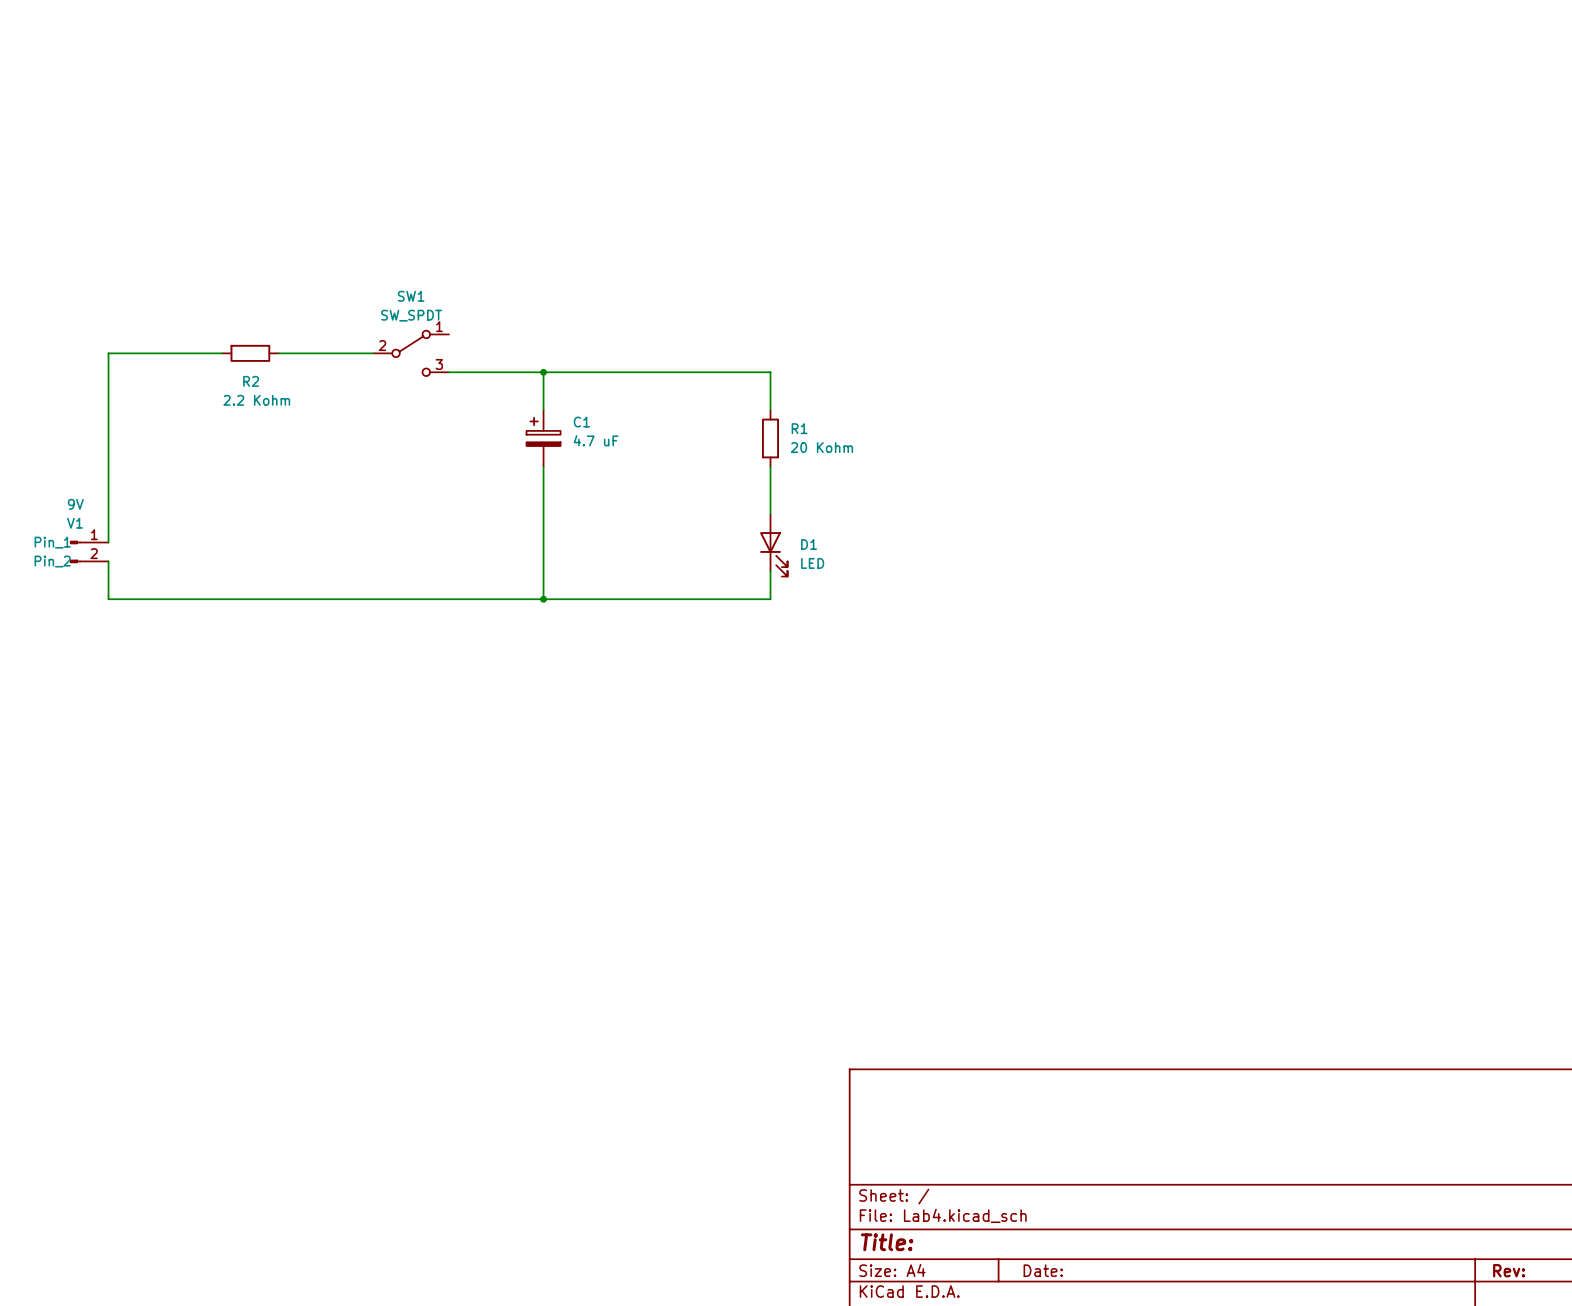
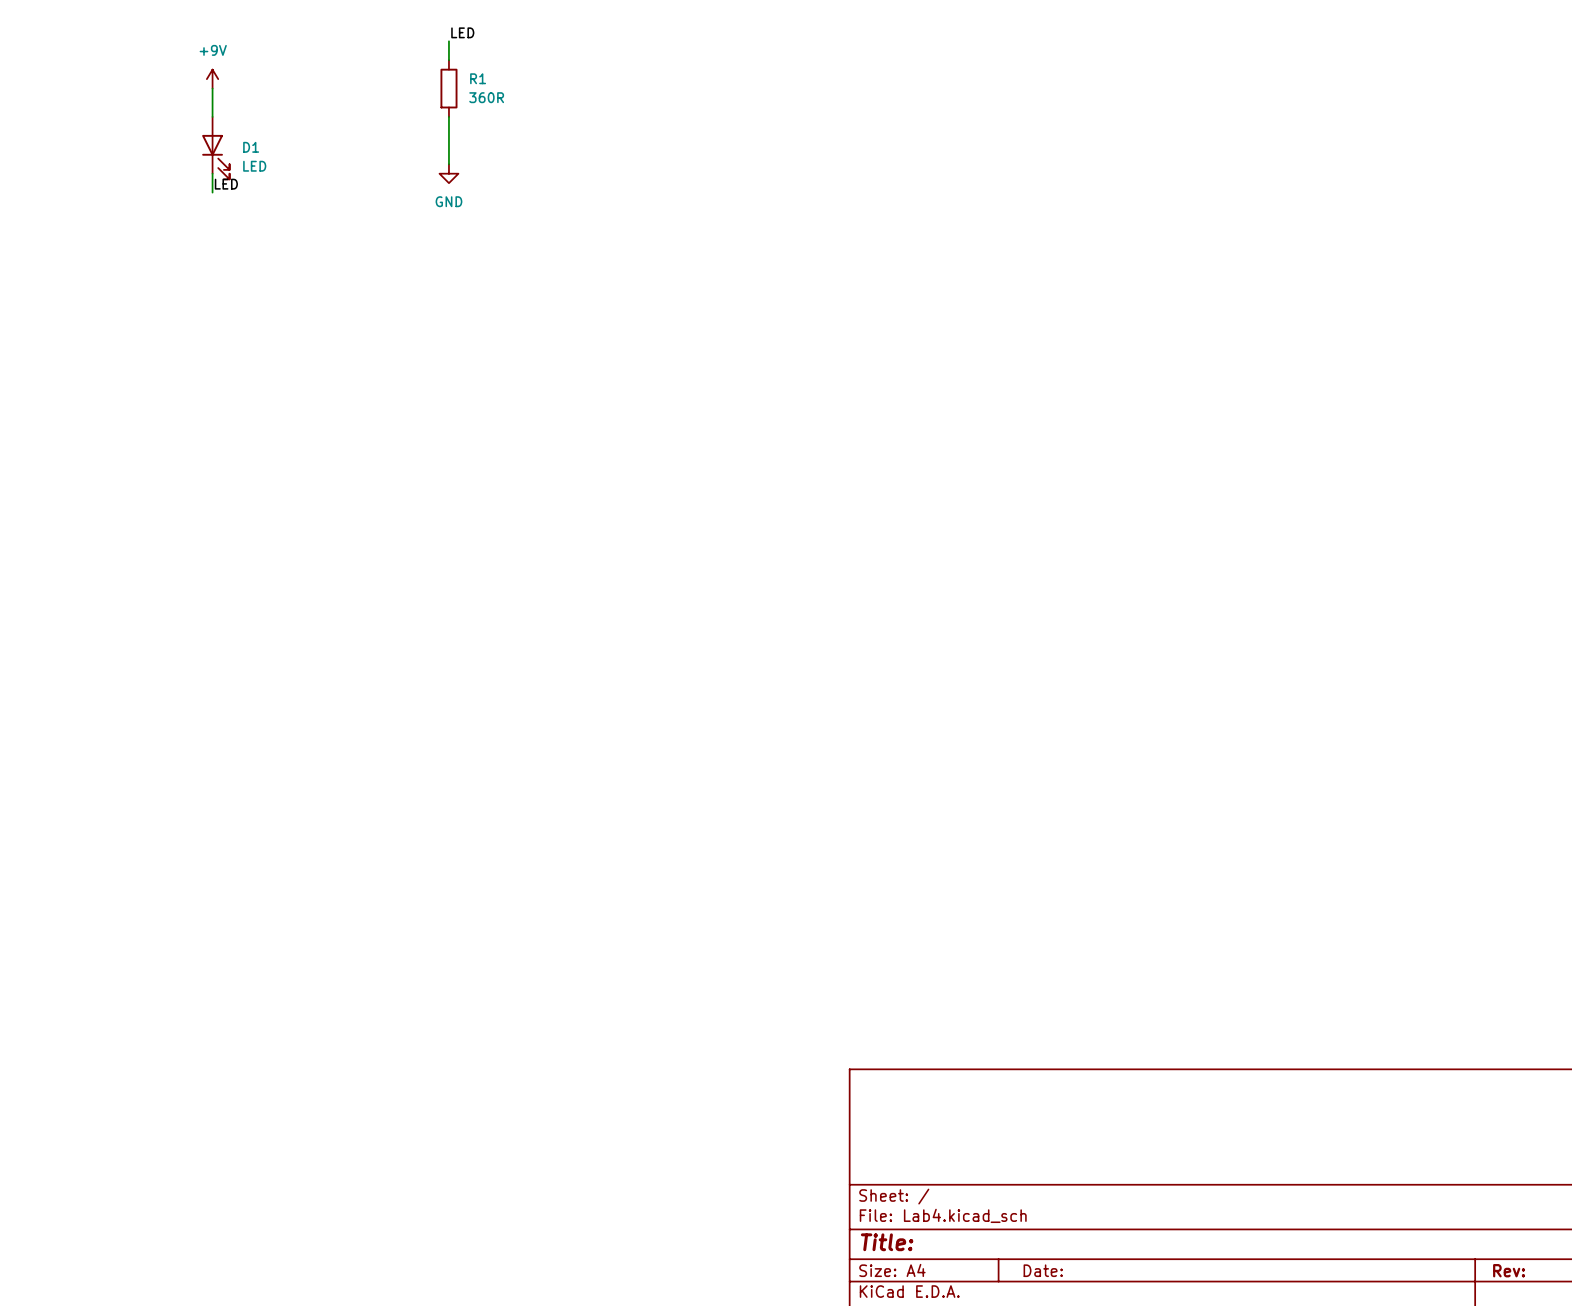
label: none -> LED (462, 32)
wire: none -> (448, 41) (448, 60)
power symbol: none -> +9V (212, 79)
wire: none -> (212, 88) (212, 116)
wire: none -> (448, 116) (448, 164)
wire: none -> (212, 173) (212, 192)
power symbol: none -> GND (448, 173)
label: none -> LED (226, 184)
wire: (222, 353) (108, 353) (108, 542) -> none
R2: 2.2 Kohm (250, 353) -> none
wire: (278, 353) (373, 353) -> none
SW1: SW_SPDT (411, 353) -> none
wire: (448, 372) (770, 372) (770, 410) -> none
wire: (543, 372) (543, 410) -> none
junction: (543, 372) -> none
C1: 4.7 uF (543, 438) -> none
R1 position: (770, 438) -> (448, 88)
R1 value: 20 Kohm (821, 447) -> 360R (486, 97)
wire: (543, 466) (543, 599) -> none
wire: (770, 466) (770, 514) -> none
D1 position: (773, 545) -> (215, 148)
9V: V1 (89, 551) -> none
wire: (108, 561) (108, 599) (770, 599) (770, 570) -> none
junction: (543, 599) -> none

